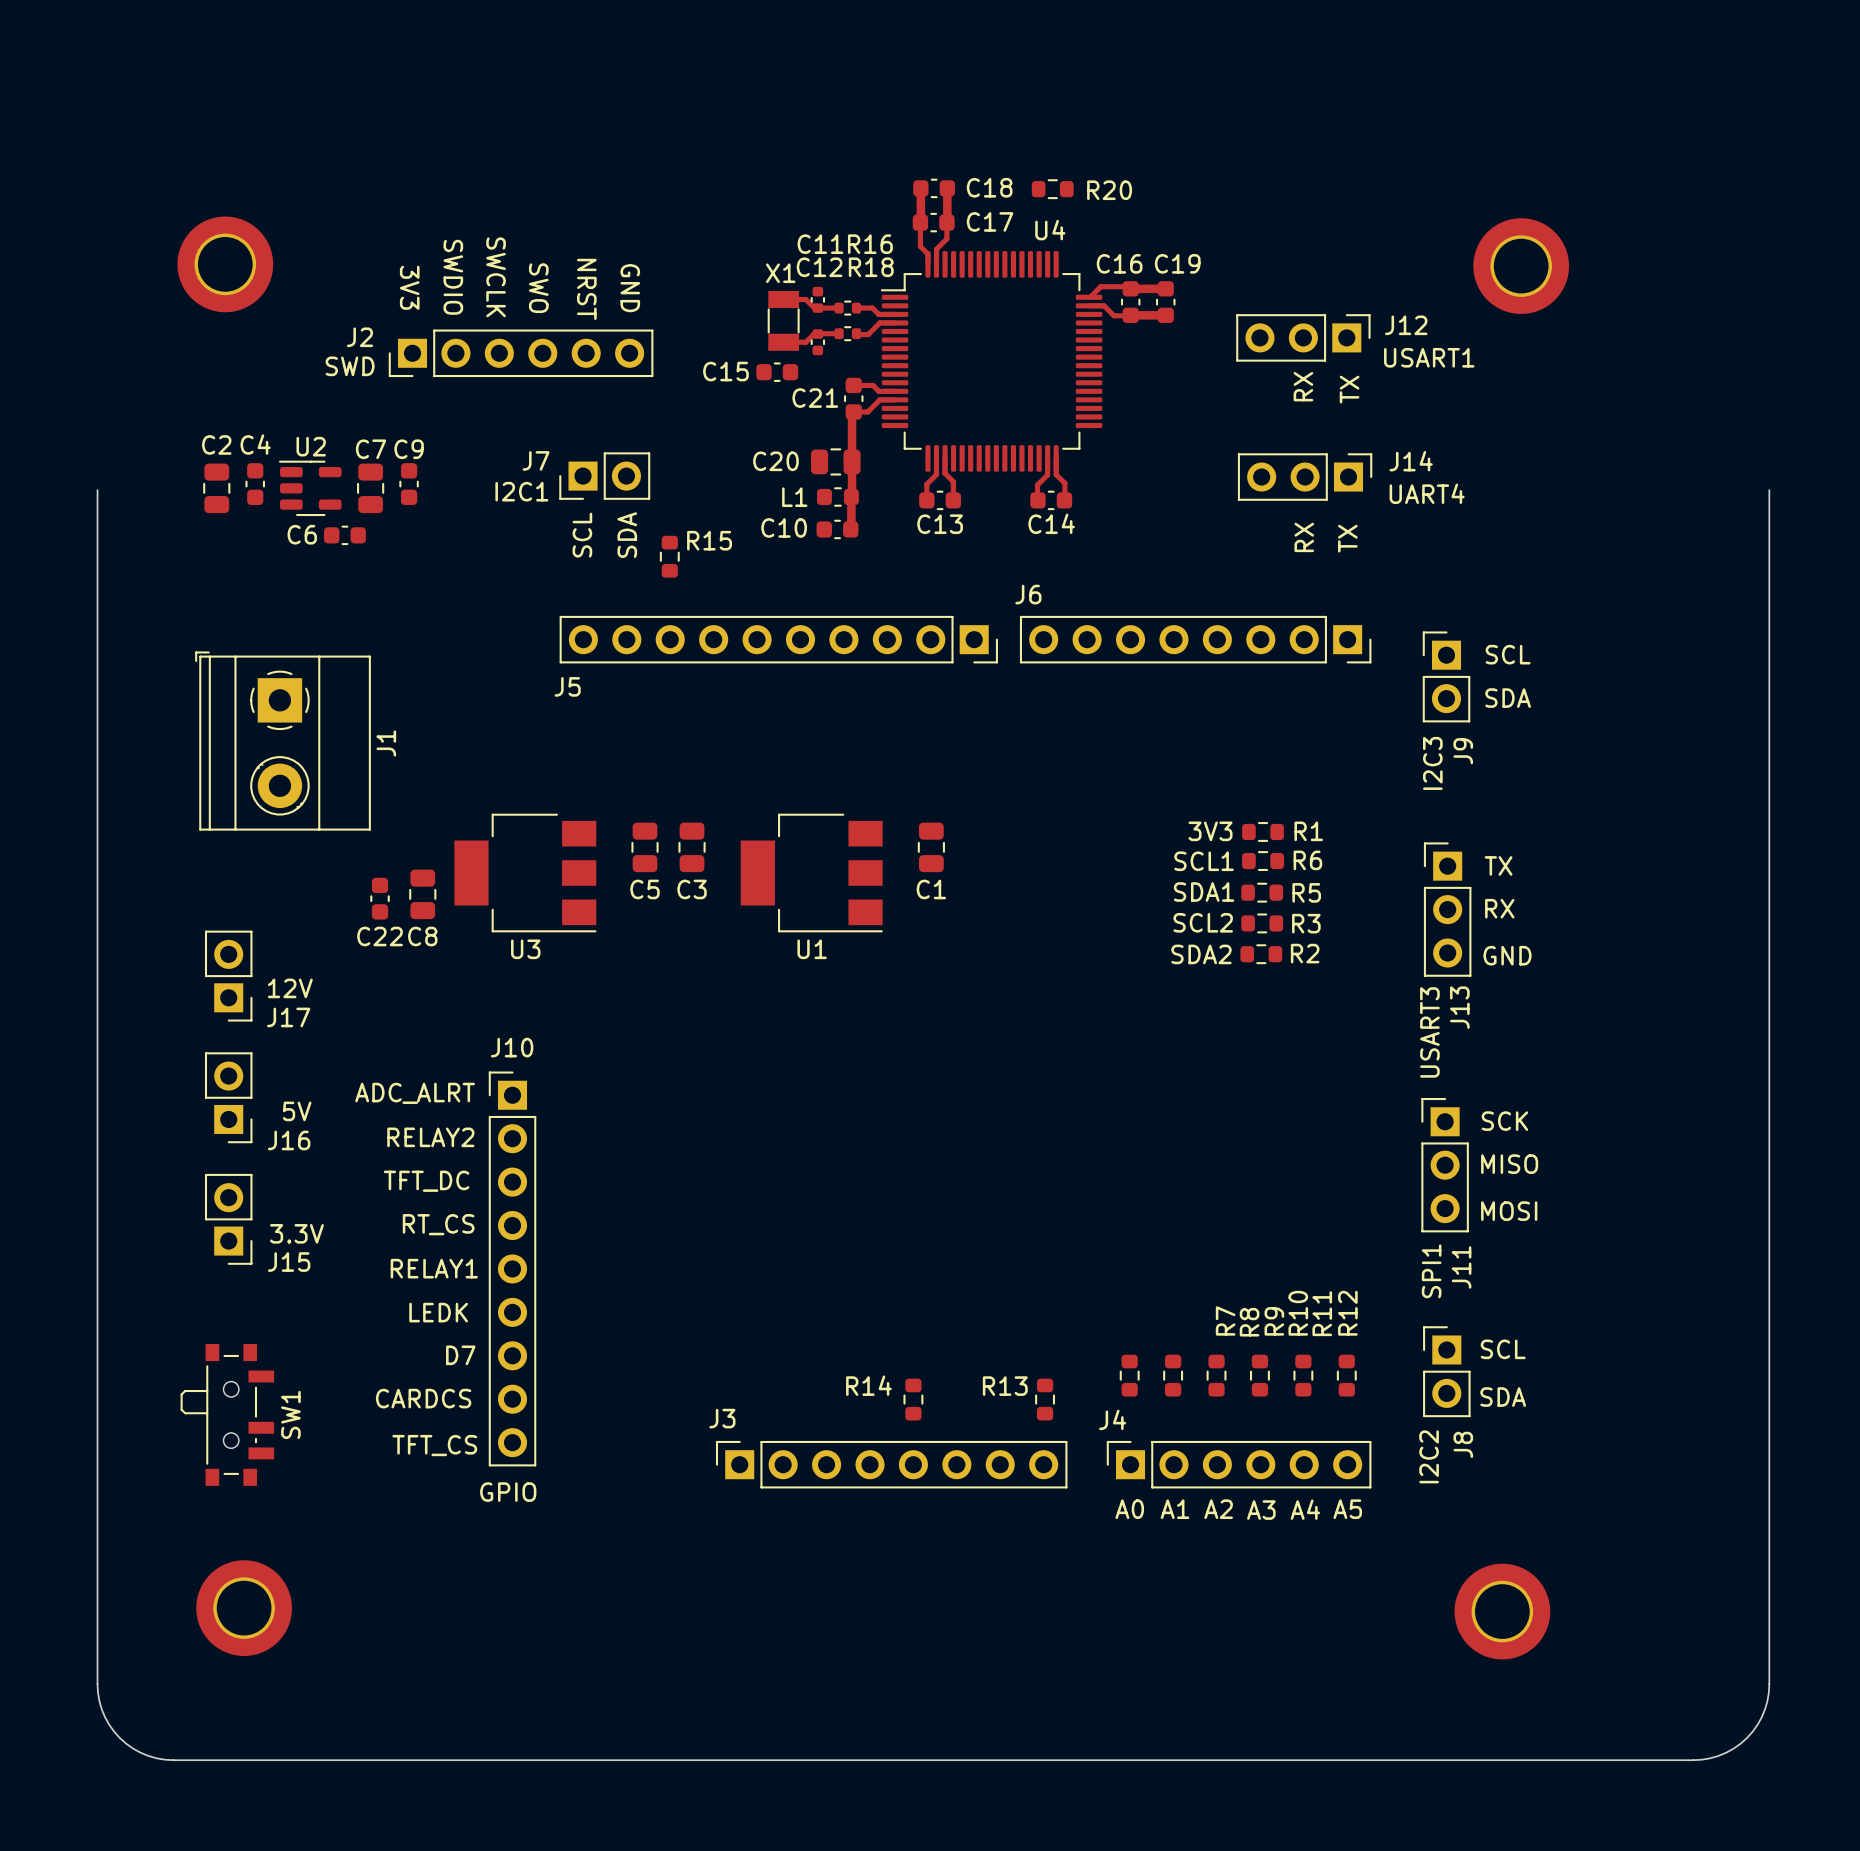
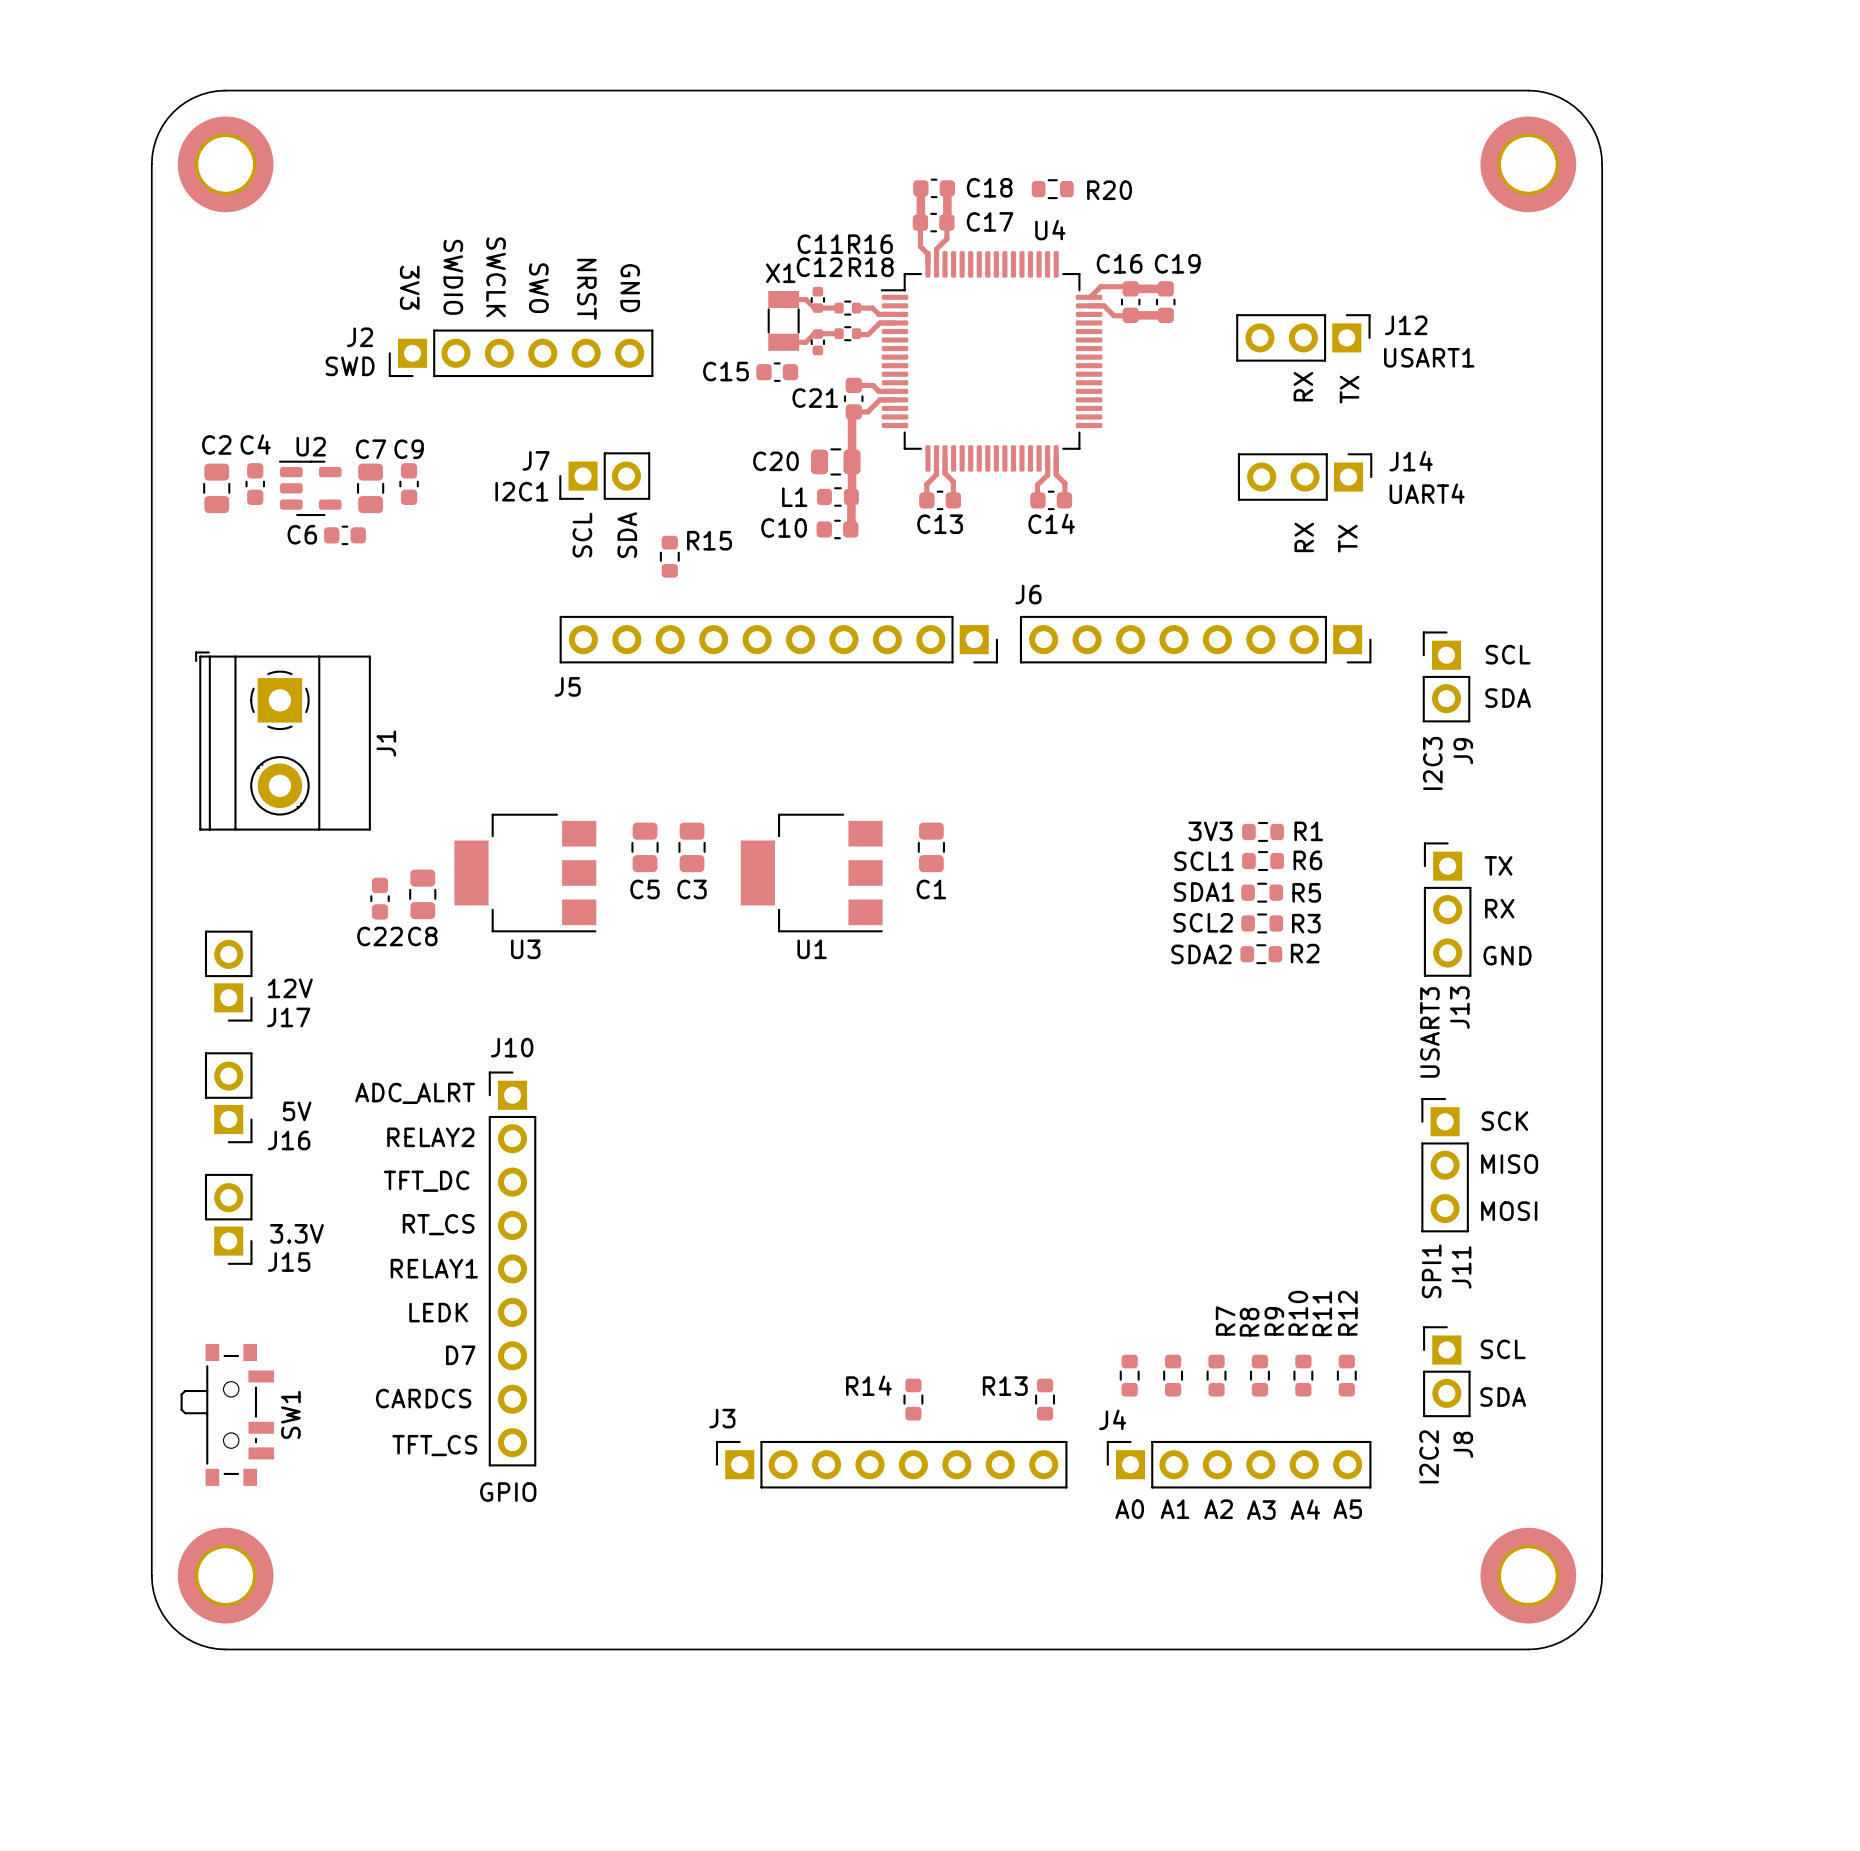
board edge: none -> (225, 90) (1528, 90) (1544, 92) (1560, 97) (1574, 106) (1586, 118) (1598, 140) (1602, 164) (1602, 1575) (1600, 1592) (1594, 1607) (1586, 1621) (1574, 1633) (1552, 1645) (1528, 1649) (225, 1649) (209, 1647) (193, 1642) (179, 1633) (167, 1621) (155, 1600) (151, 1575) (151, 164) (153, 147) (159, 132) (173, 112) (193, 97) (209, 92) (225, 90)
part position: (225, 264) -> (225, 164)
part position: (1521, 266) -> (1528, 164)
board edge: (97, 490) (97, 1692) (101, 1709) (109, 1724) (126, 1743) (148, 1755) (173, 1760) (1693, 1760) (1718, 1755) (1740, 1743) (1752, 1731) (1761, 1717) (1767, 1701) (1769, 1684) (1769, 490) -> none
part position: (244, 1608) -> (225, 1575)
part position: (1502, 1611) -> (1528, 1575)

